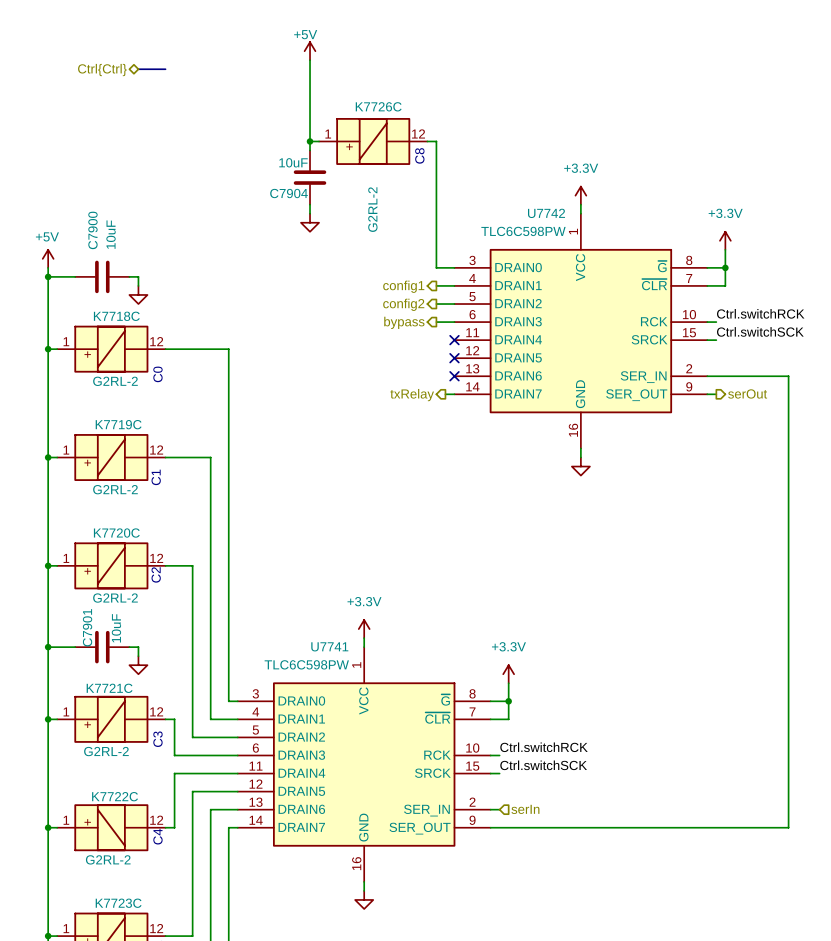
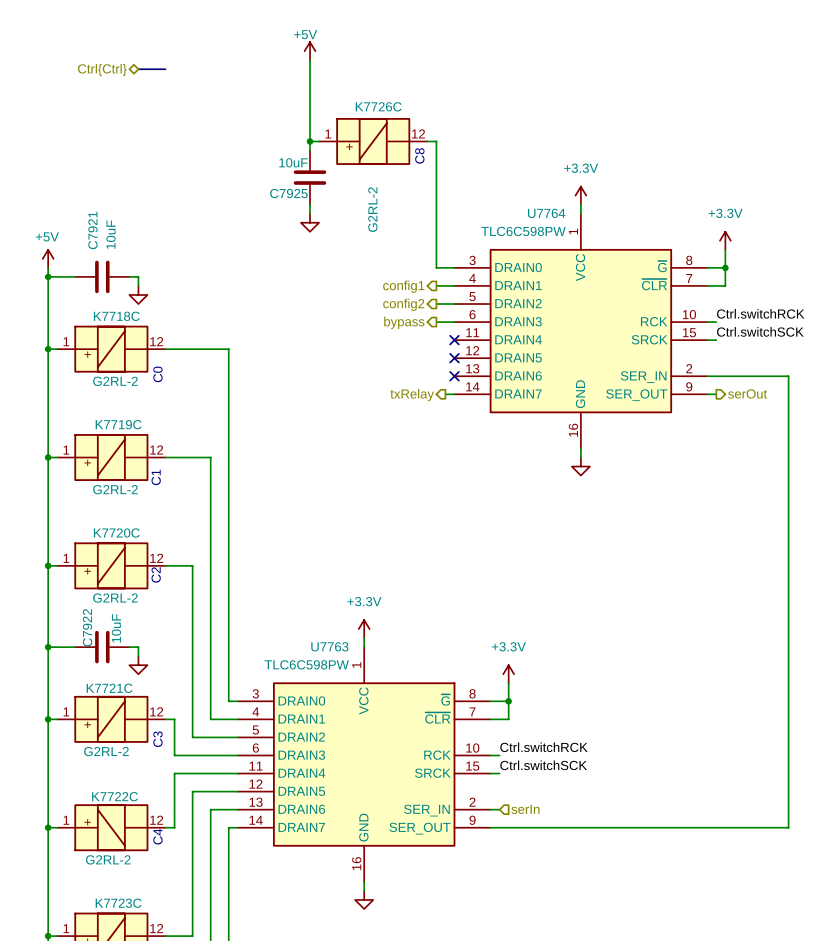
C7904 name: C7904 (289, 193) -> C7925 (288, 193)
U7742 name: U7742 (546, 213) -> U7764 (546, 213)
C7900 name: C7900 (92, 230) -> C7921 (92, 230)
C7901 name: C7901 (87, 627) -> C7922 (87, 627)
U7741 name: U7741 (329, 646) -> U7763 (329, 646)

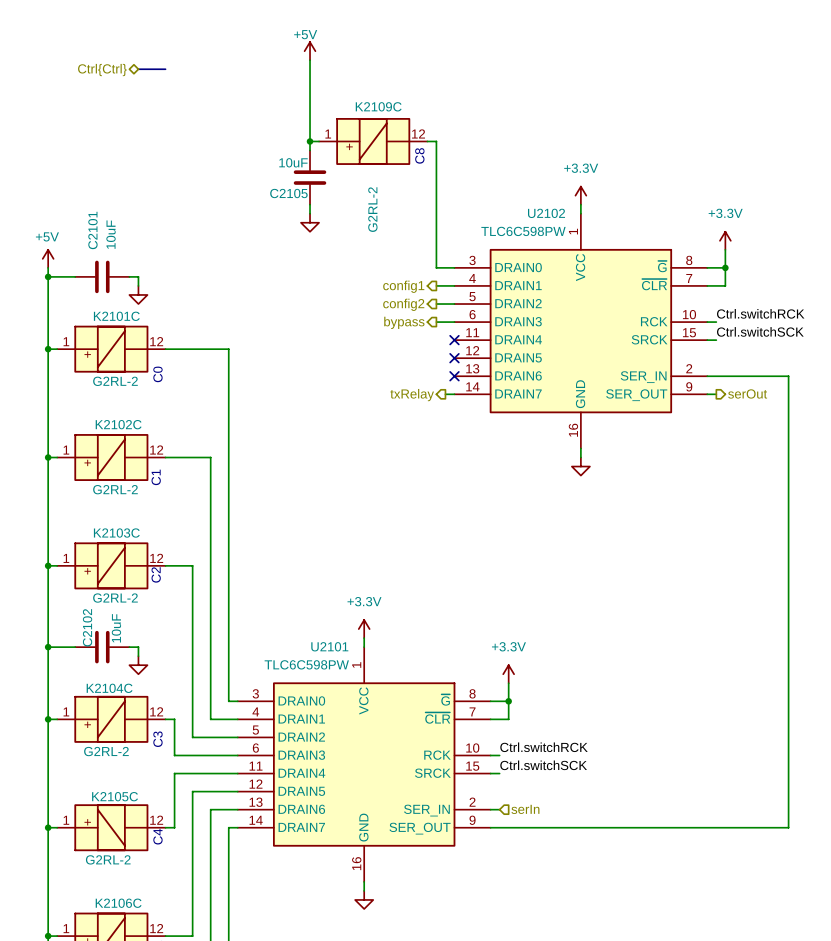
K7726C name: K7726C (378, 106) -> K2109C (378, 106)
C7925 name: C7925 (288, 193) -> C2105 (288, 193)
U7764 name: U7764 (546, 213) -> U2102 (546, 213)
C7921 name: C7921 (92, 230) -> C2101 (92, 230)
K7718C name: K7718C (116, 316) -> K2101C (116, 316)
K7719C name: K7719C (118, 424) -> K2102C (118, 424)
K7720C name: K7720C (116, 533) -> K2103C (116, 533)
C7922 name: C7922 (87, 627) -> C2102 (87, 627)
U7763 name: U7763 (329, 646) -> U2101 (329, 646)
K7721C name: K7721C (109, 688) -> K2104C (109, 688)
K7722C name: K7722C (115, 796) -> K2105C (115, 796)
K7723C name: K7723C (118, 903) -> K2106C (118, 903)

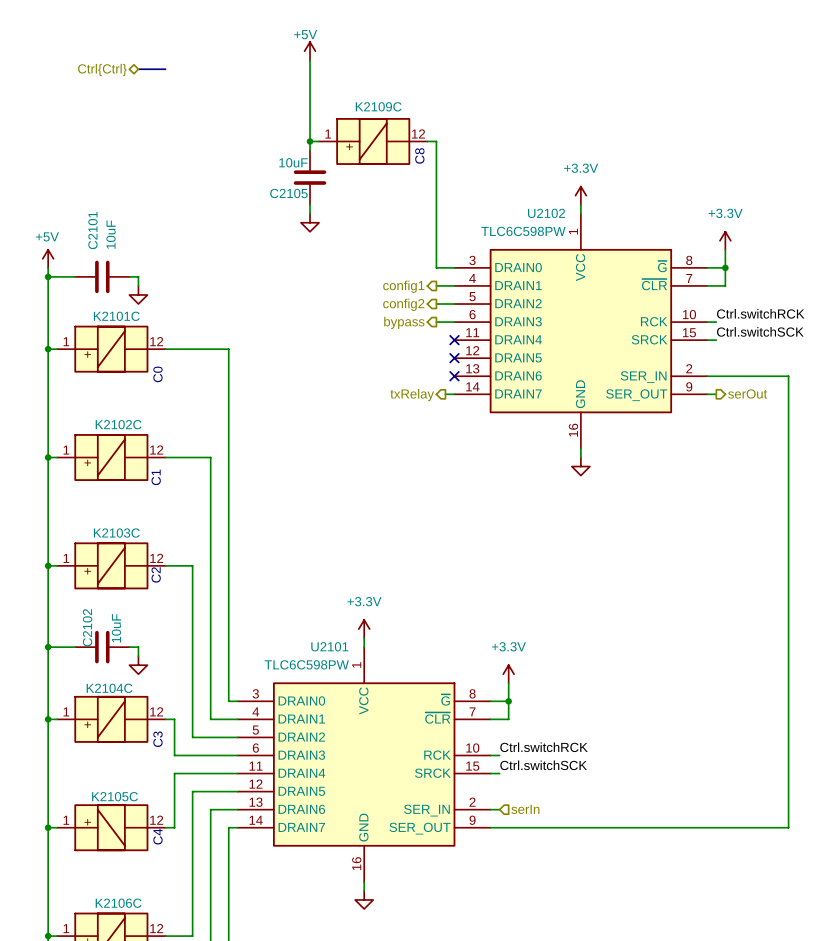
K2109C value: G2RL-2 (372, 209) -> none
K2101C value: G2RL-2 (115, 381) -> none
K2102C value: G2RL-2 (115, 489) -> none
K2103C value: G2RL-2 (115, 598) -> none
K2104C value: G2RL-2 (106, 751) -> none
K2105C value: G2RL-2 (108, 859) -> none

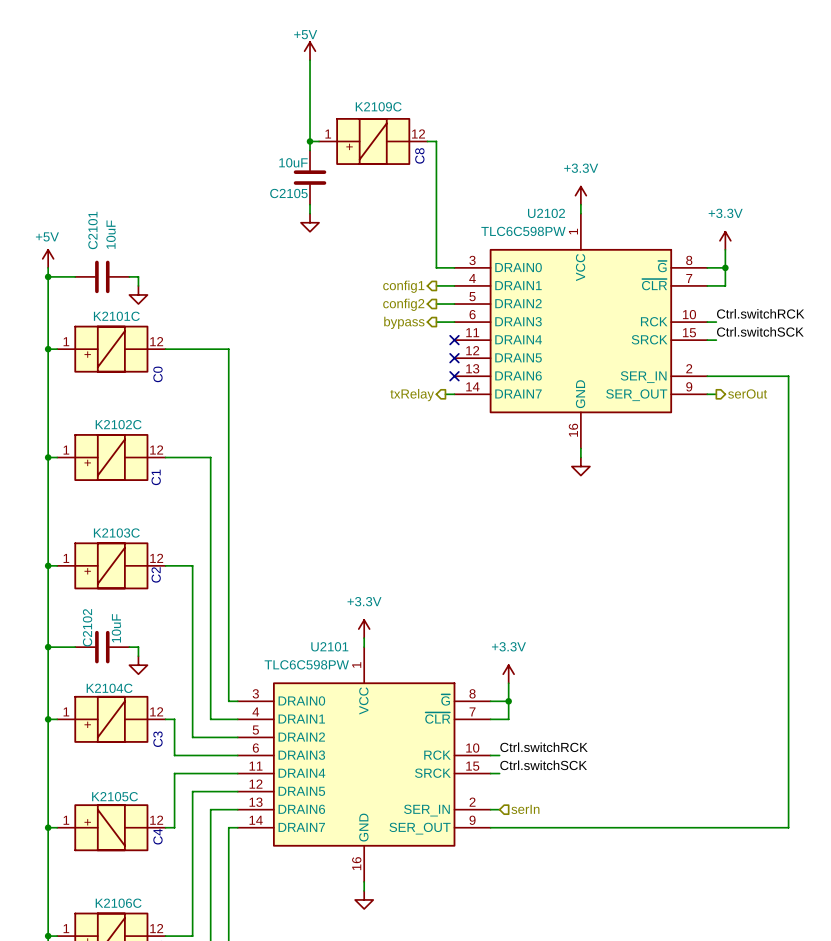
bus: (138, 69) (165, 69) -> none
hierarchical label: Ctrl{Ctrl} (102, 70) -> none

